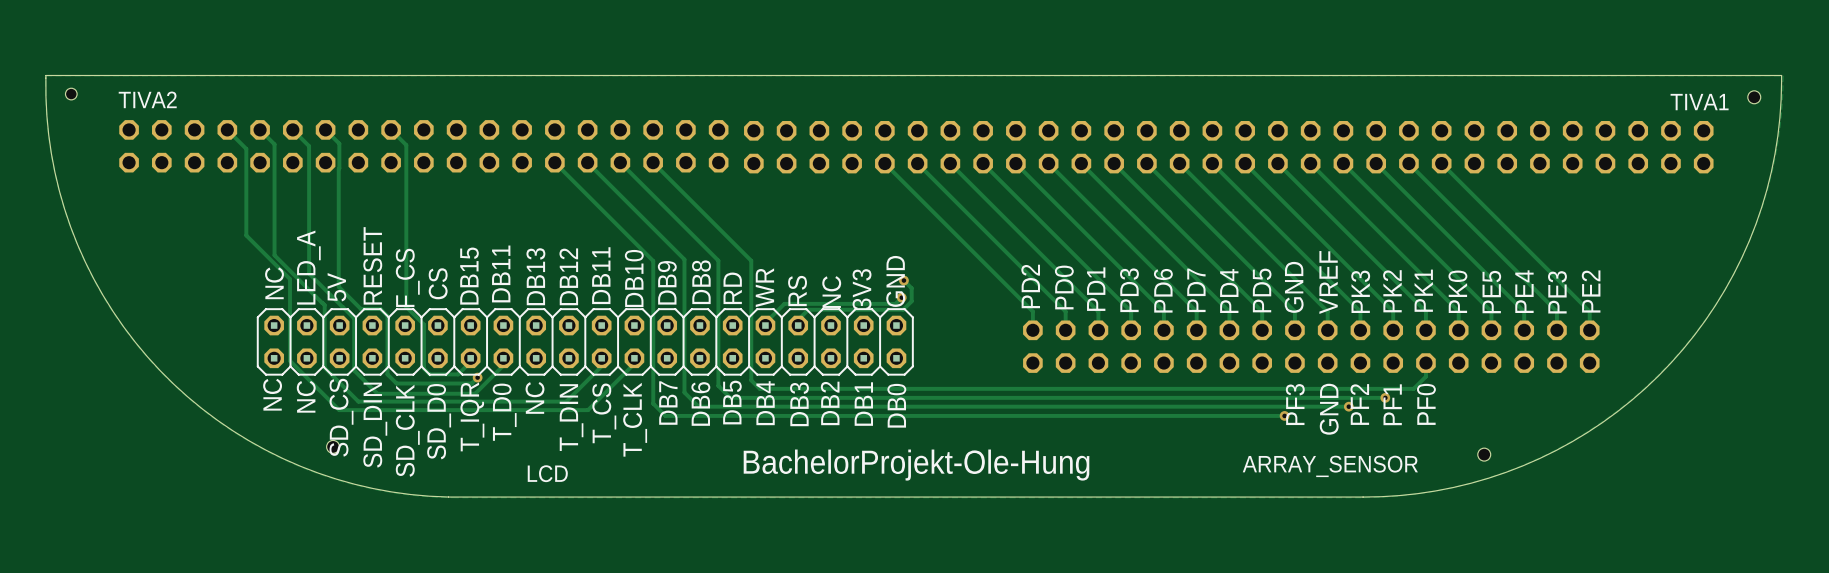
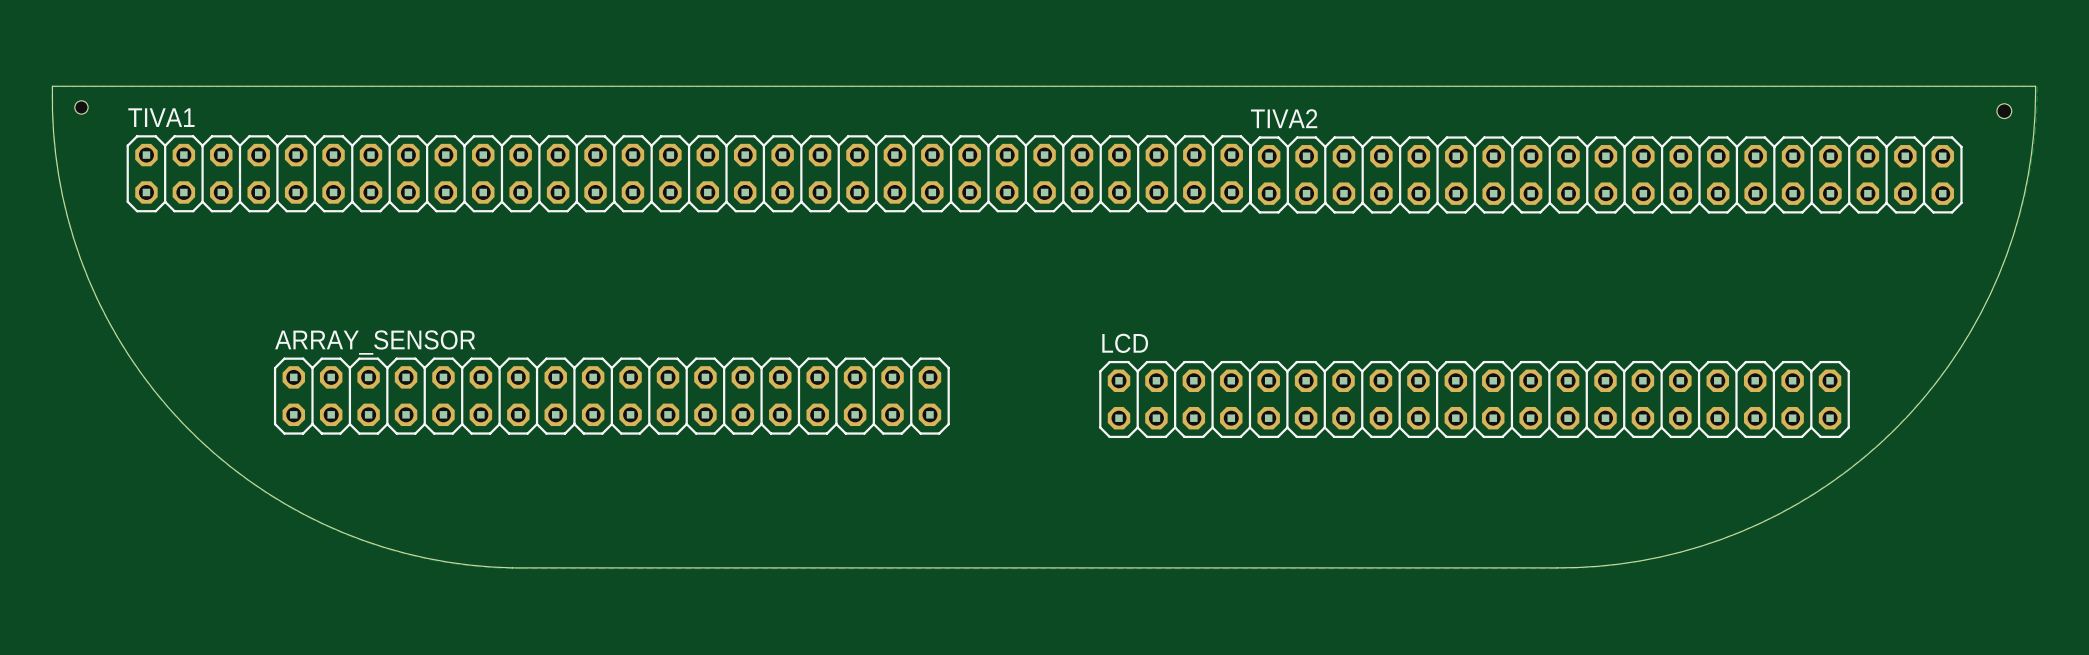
track: (227, 129) (246, 148) (246, 235) (290, 279) (290, 360) (339, 410) (588, 410) (634, 363) (634, 358) -> none
track: (260, 129) (274, 144) (274, 255) (324, 305) (324, 367) (358, 401) (566, 401) (601, 366) (601, 358) -> none
track: (292, 129) (309, 146) (309, 273) (342, 307) -> none
track: (325, 129) (339, 143) (338, 286) (360, 308) (380, 308) (387, 315) (387, 374) (396, 383) (471, 383) (477, 377) -> none
track: (391, 129) (406, 145) (406, 306) (423, 324) (423, 368) (429, 374) (458, 374) (470, 361) (470, 358) -> none
TIVA2 side: bottom (423, 146) -> top (1605, 174)
TIVA1 side: bottom (1228, 147) -> top (689, 173)
track: (554, 162) (653, 261) (653, 403) (665, 415) (1284, 415) -> none
track: (587, 162) (684, 259) (684, 392) (698, 406) (1348, 406) -> none
track: (620, 162) (718, 260) (718, 385) (730, 397) (1385, 397) -> none
track: (653, 162) (751, 260) (751, 380) (759, 388) (1413, 388) (1425, 376) (1425, 363) -> none
track: (884, 163) (1032, 311) (1032, 330) -> none
track: (917, 163) (1065, 311) (1065, 330) -> none
track: (950, 163) (1098, 311) (1098, 330) -> none
track: (983, 163) (1131, 311) (1131, 330) -> none
track: (1015, 163) (1163, 311) (1163, 330) -> none
track: (1048, 163) (1196, 311) (1196, 330) -> none
track: (1081, 163) (1229, 311) (1229, 330) -> none
track: (1114, 163) (1262, 311) (1262, 330) -> none
track: (1146, 163) (1294, 311) (1294, 330) -> none
track: (1179, 163) (1327, 311) (1327, 330) -> none
track: (1212, 163) (1360, 311) (1360, 330) -> none
track: (1245, 163) (1393, 311) (1393, 330) -> none
track: (1277, 163) (1425, 311) (1425, 330) -> none
track: (1310, 163) (1458, 311) (1458, 330) -> none
track: (1343, 163) (1491, 311) (1491, 330) -> none
track: (1376, 163) (1524, 311) (1524, 330) -> none
track: (1408, 163) (1556, 311) (1556, 330) -> none
track: (1441, 163) (1589, 311) (1589, 330) -> none
text: RESET (372, 265) -> none
text: LED_A (308, 267) -> none
text: DB11 (501, 273) -> none
text: DB11 (601, 275) -> none
text: DB15 (469, 276) -> none
text: DB13 (535, 276) -> none
text: DB12 (568, 276) -> none
text: F_CS (407, 277) -> none
text: DB10 (634, 278) -> none
track: (903, 280) (911, 288) (911, 301) (903, 309) (808, 309) (798, 319) (798, 325) -> none
via: (903, 280) -> none
text: GND (895, 281) -> none
text: DB9 (667, 282) -> none
text: DB8 (701, 282) -> none
text: VREF (1328, 282) -> none
text: NC (274, 283) -> none
text: CS (438, 283) -> none
text: PD2 (1030, 286) -> none
text: 5V (336, 287) -> none
text: WR (764, 287) -> none
text: PD0 (1064, 287) -> none
text: GND (1294, 287) -> none
text: RD (732, 288) -> none
text: 3V3 (862, 289) -> none
text: PD1 (1096, 289) -> none
text: PD3 (1129, 290) -> none
text: PD6 (1163, 290) -> none
text: PD7 (1196, 290) -> none
text: PD4 (1229, 290) -> none
text: PD5 (1262, 290) -> none
text: PK1 (1423, 290) -> none
text: RS (797, 291) -> none
text: PK3 (1360, 291) -> none
text: PK2 (1392, 291) -> none
text: PK0 (1457, 291) -> none
text: PE4 (1524, 291) -> none
text: PE2 (1591, 291) -> none
text: NC (831, 292) -> none
text: PE5 (1491, 292) -> none
text: PE3 (1557, 292) -> none
track: (901, 297) (895, 303) (784, 303) (765, 322) (765, 325) -> none
via: (901, 297) -> none
track: (343, 307) (354, 318) (354, 370) (377, 393) (475, 393) (503, 365) (503, 358) -> none
LCD: (585, 341) -> none
ARRAY_SENSOR: none -> (611, 396)
ARRAY_SENSOR: (1311, 346) -> none
LCD: none -> (1474, 399)
via: (477, 377) -> none
text: NC (272, 394) -> none
text: NC (306, 396) -> none
text: NC (534, 397) -> none
via: (1385, 397) -> none
text: DB5 (732, 402) -> none
text: DB7 (668, 403) -> none
text: DB4 (765, 403) -> none
text: DB2 (830, 403) -> none
text: DB6 (700, 404) -> none
text: DB3 (799, 404) -> none
text: DB1 (863, 404) -> none
text: PF3 (1295, 404) -> none
text: PF2 (1359, 404) -> none
text: PF1 (1392, 404) -> none
text: PF0 (1426, 404) -> none
text: DB0 (896, 405) -> none
via: (1348, 406) -> none
text: GND (1329, 409) -> none
text: T_D0 (504, 412) -> none
text: T_CS (604, 413) -> none
via: (1284, 415) -> none
text: T_IQR (472, 416) -> none
text: SD_CS (341, 417) -> none
text: T_DIN (571, 417) -> none
text: T_CLK (635, 419) -> none
text: SD_D0 (439, 421) -> none
text: SD_DIN (375, 425) -> none
text: SD_CLK (407, 430) -> none
hole: (333, 446) -> none
hole: (1484, 454) -> none
text: BachelorProjekt-Ole-Hung (916, 465) -> none

